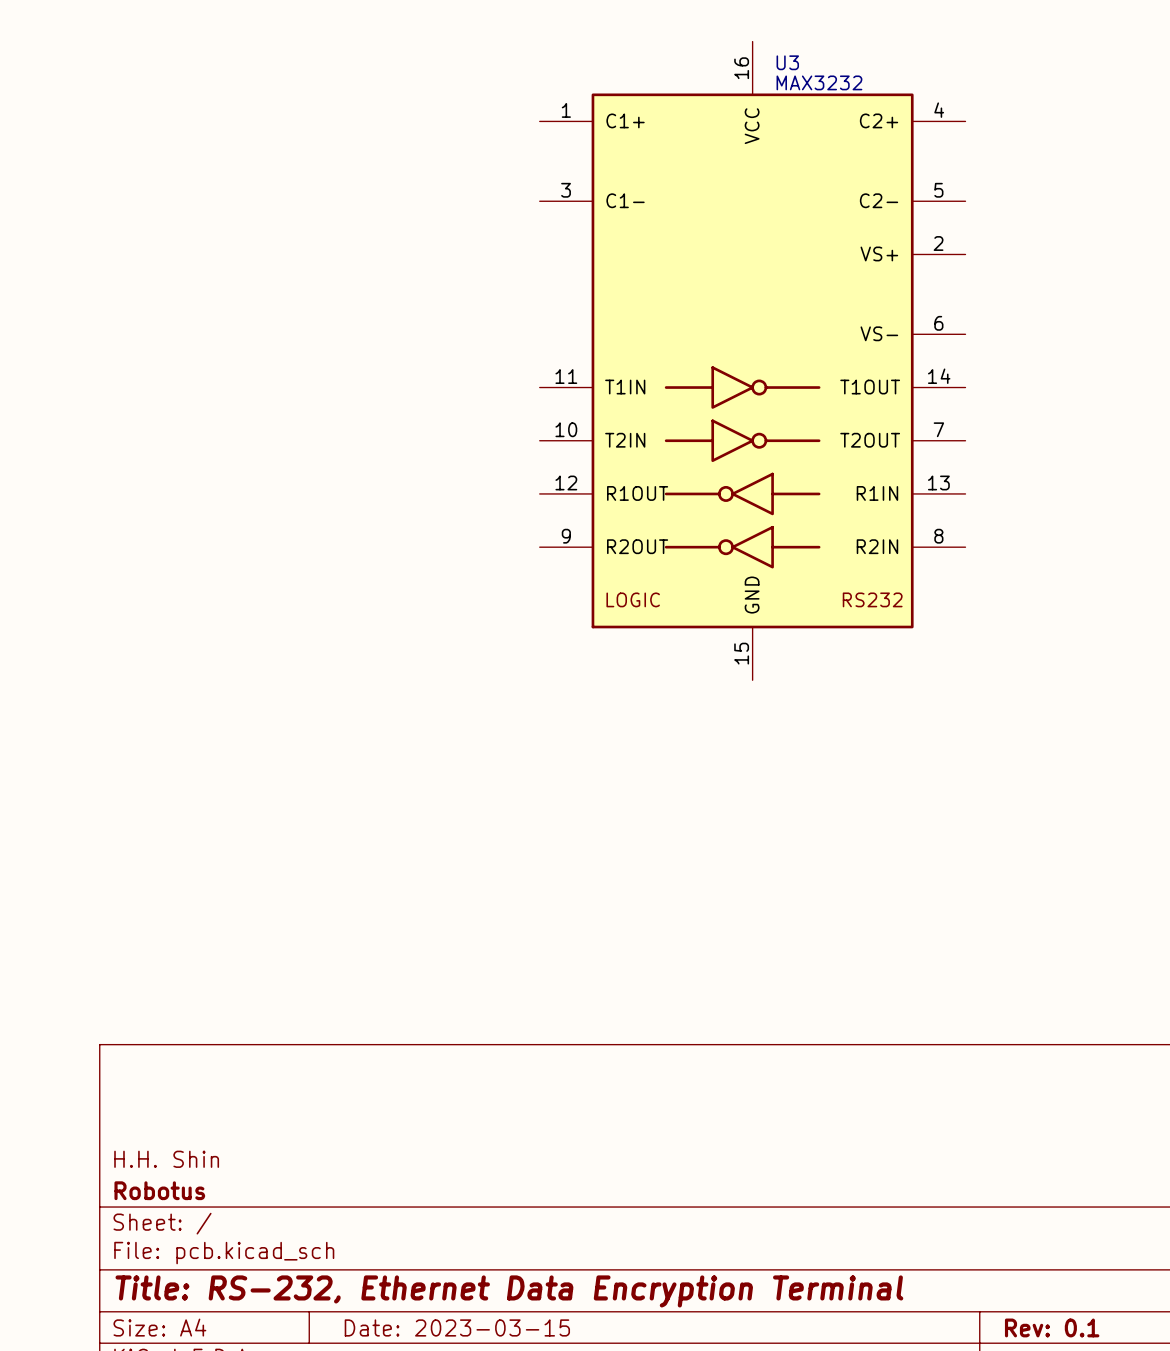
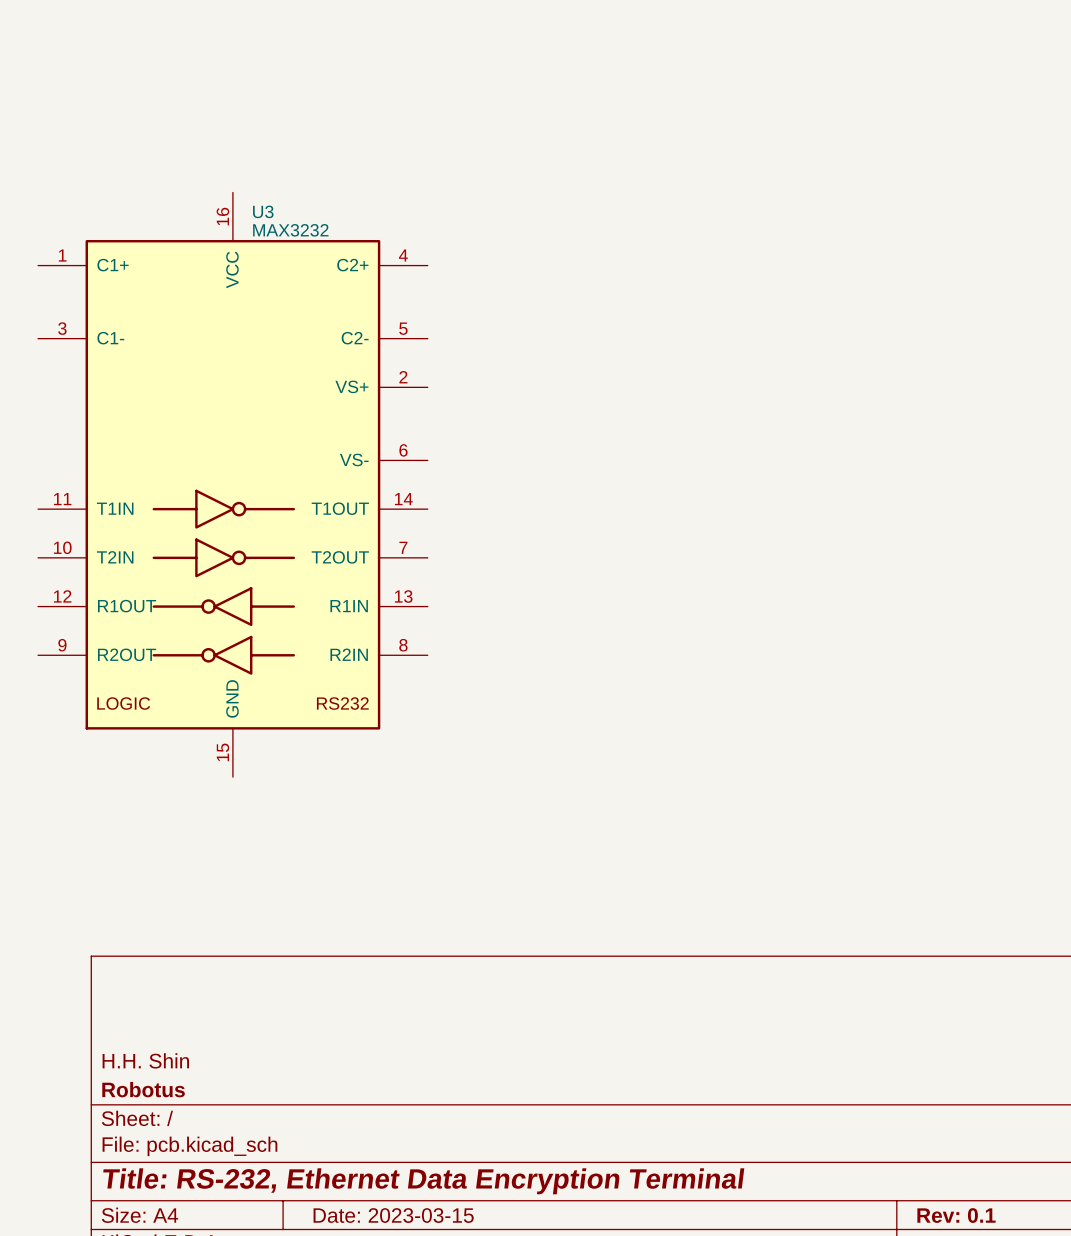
U3 position: (752, 360) -> (232, 484)

